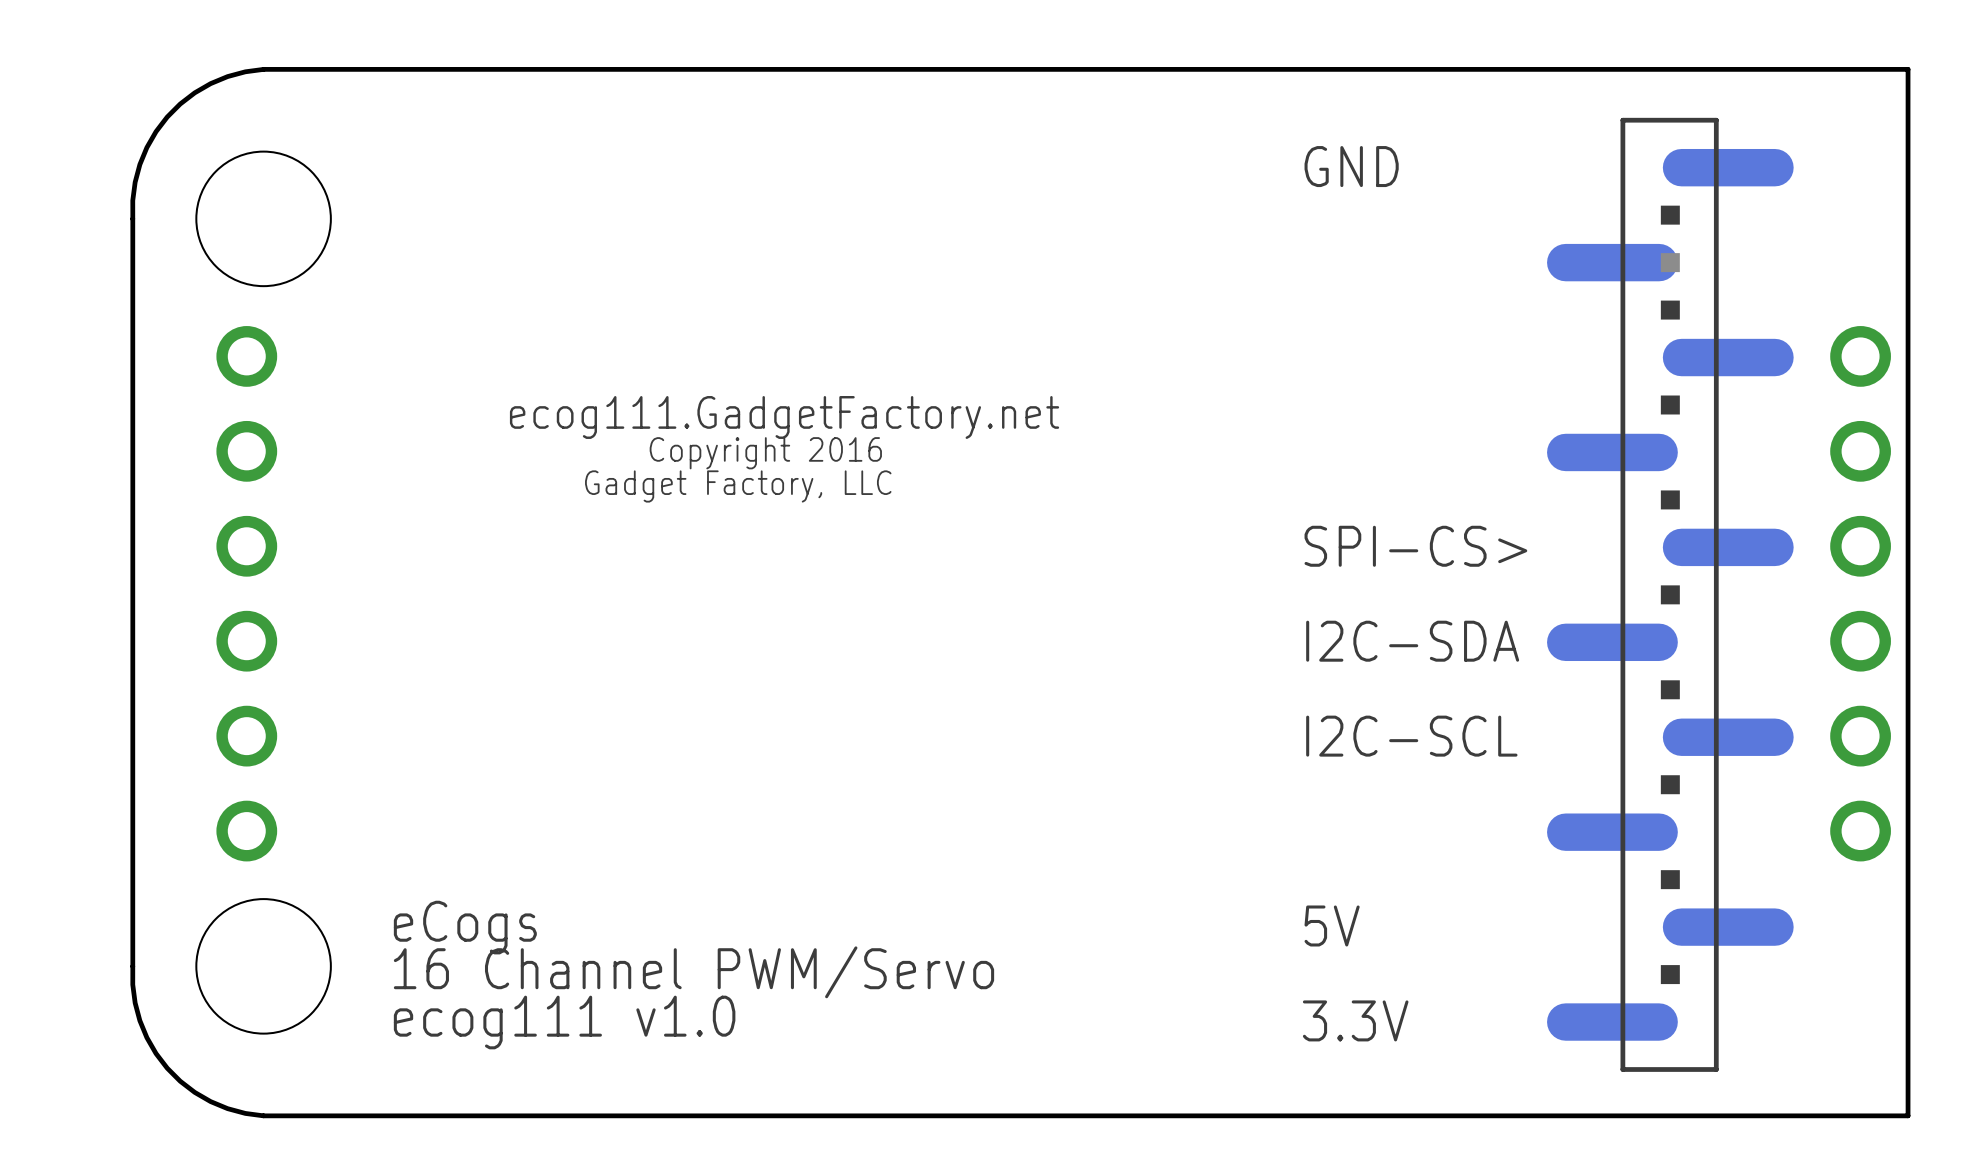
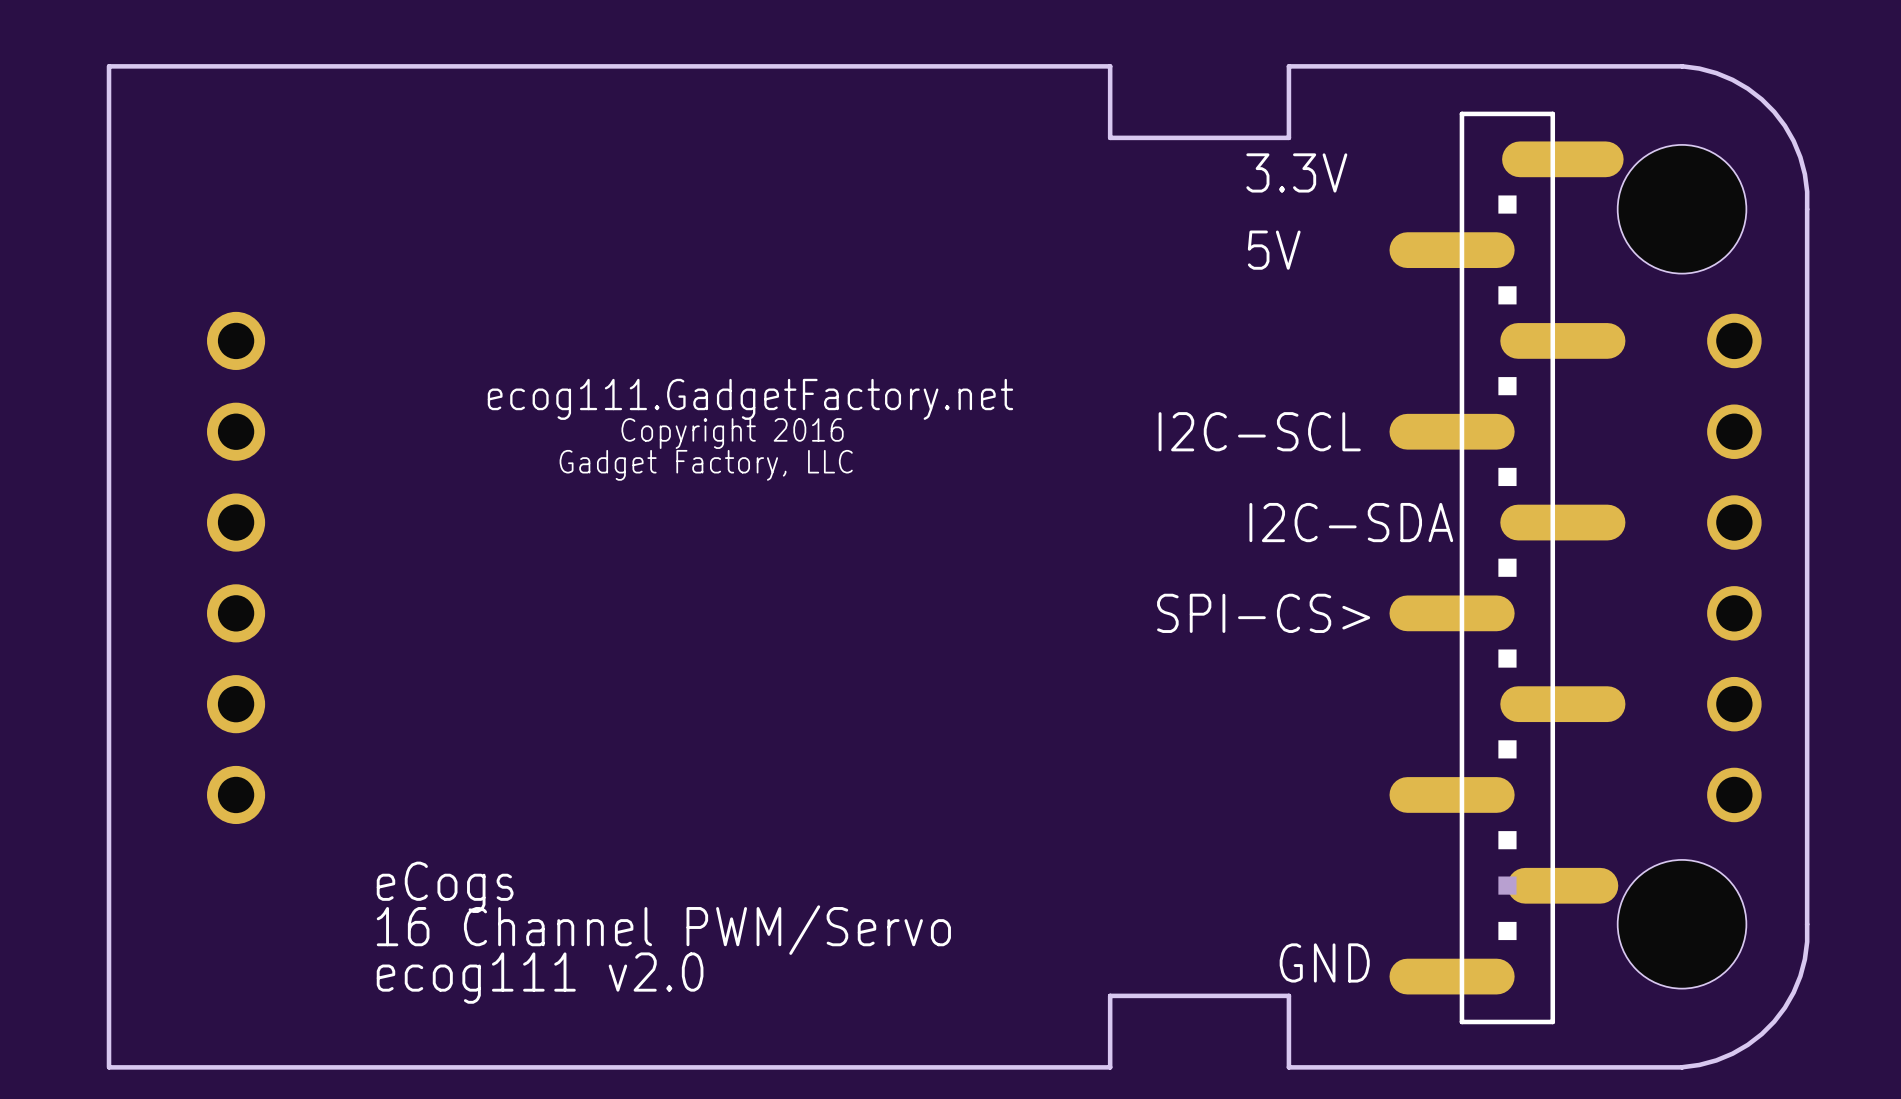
part footprint: [130, 67, 1911, 1119] -> [106, 63, 1810, 1070]
text position: GND (1351, 166) -> GND (1324, 962)
text: SPI-CS> (1415, 546) -> I2C-SDA (1351, 522)
part: none -> (1734, 567)
part: (1860, 593) -> none
text: none -> SPI-CS> (1263, 613)
text: I2C-SDA (1412, 641) -> none
text position: I2C-SCL (1411, 736) -> I2C-SCL (1259, 431)
text position: 5V (1332, 925) -> 5V (1274, 250)
text position: 3.3V (1355, 1020) -> 3.3V (1296, 172)
text: ecog111 v1.0 (564, 1022) -> ecog111 v2.0 (540, 978)

